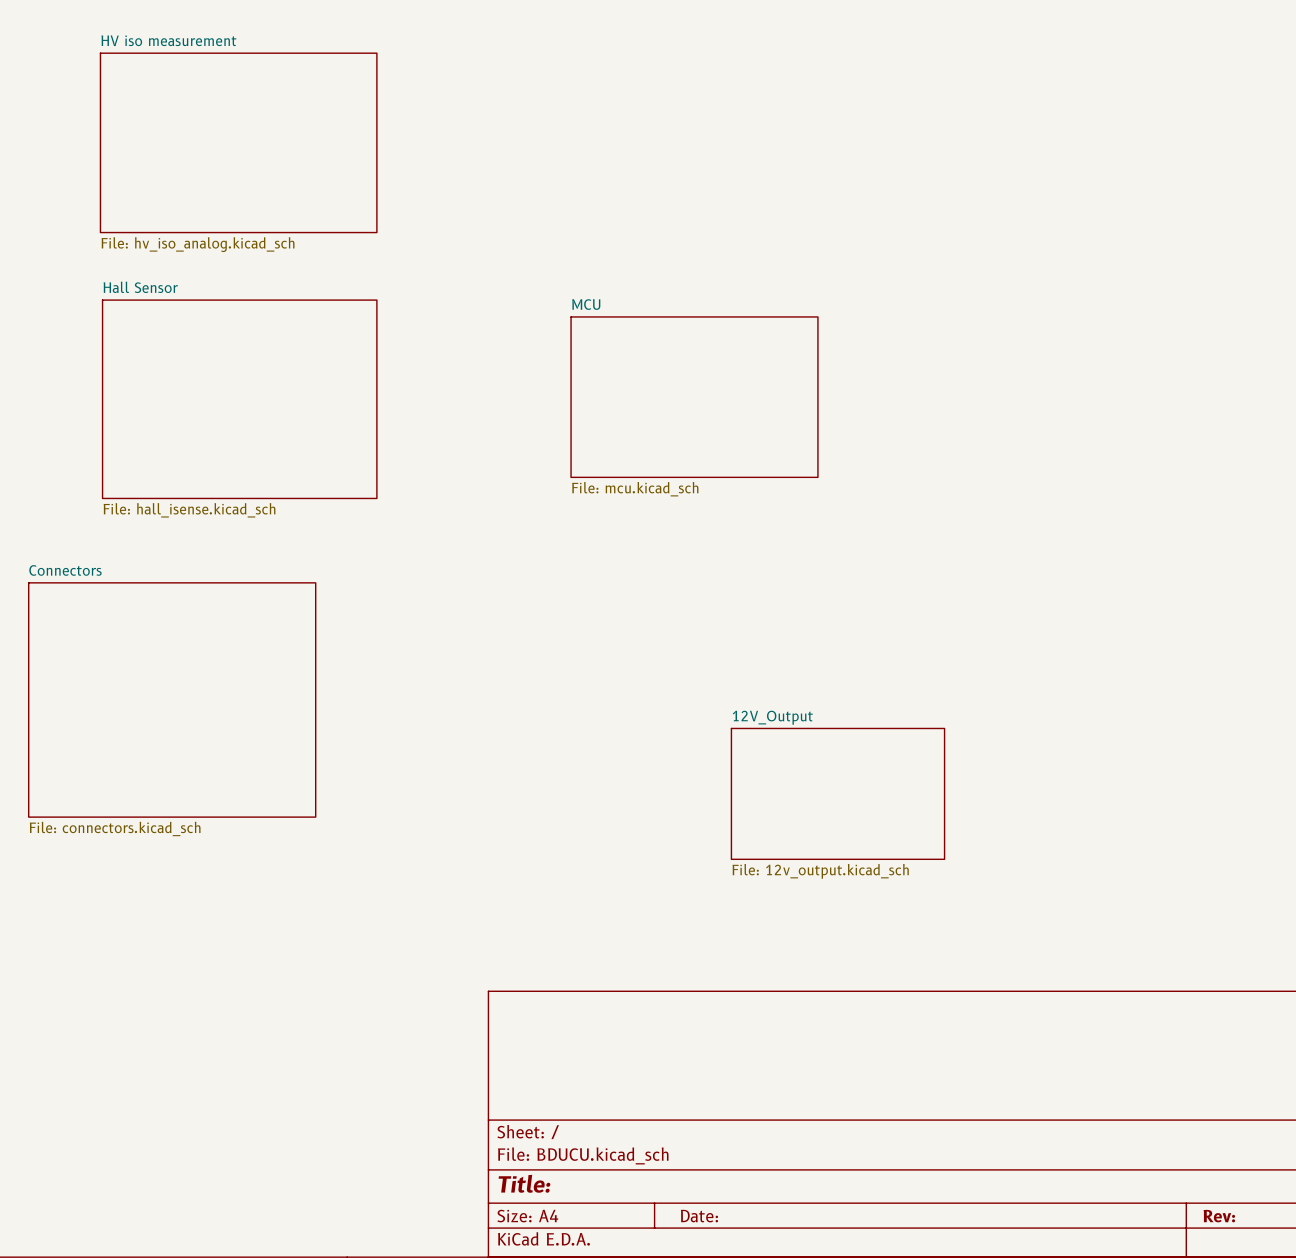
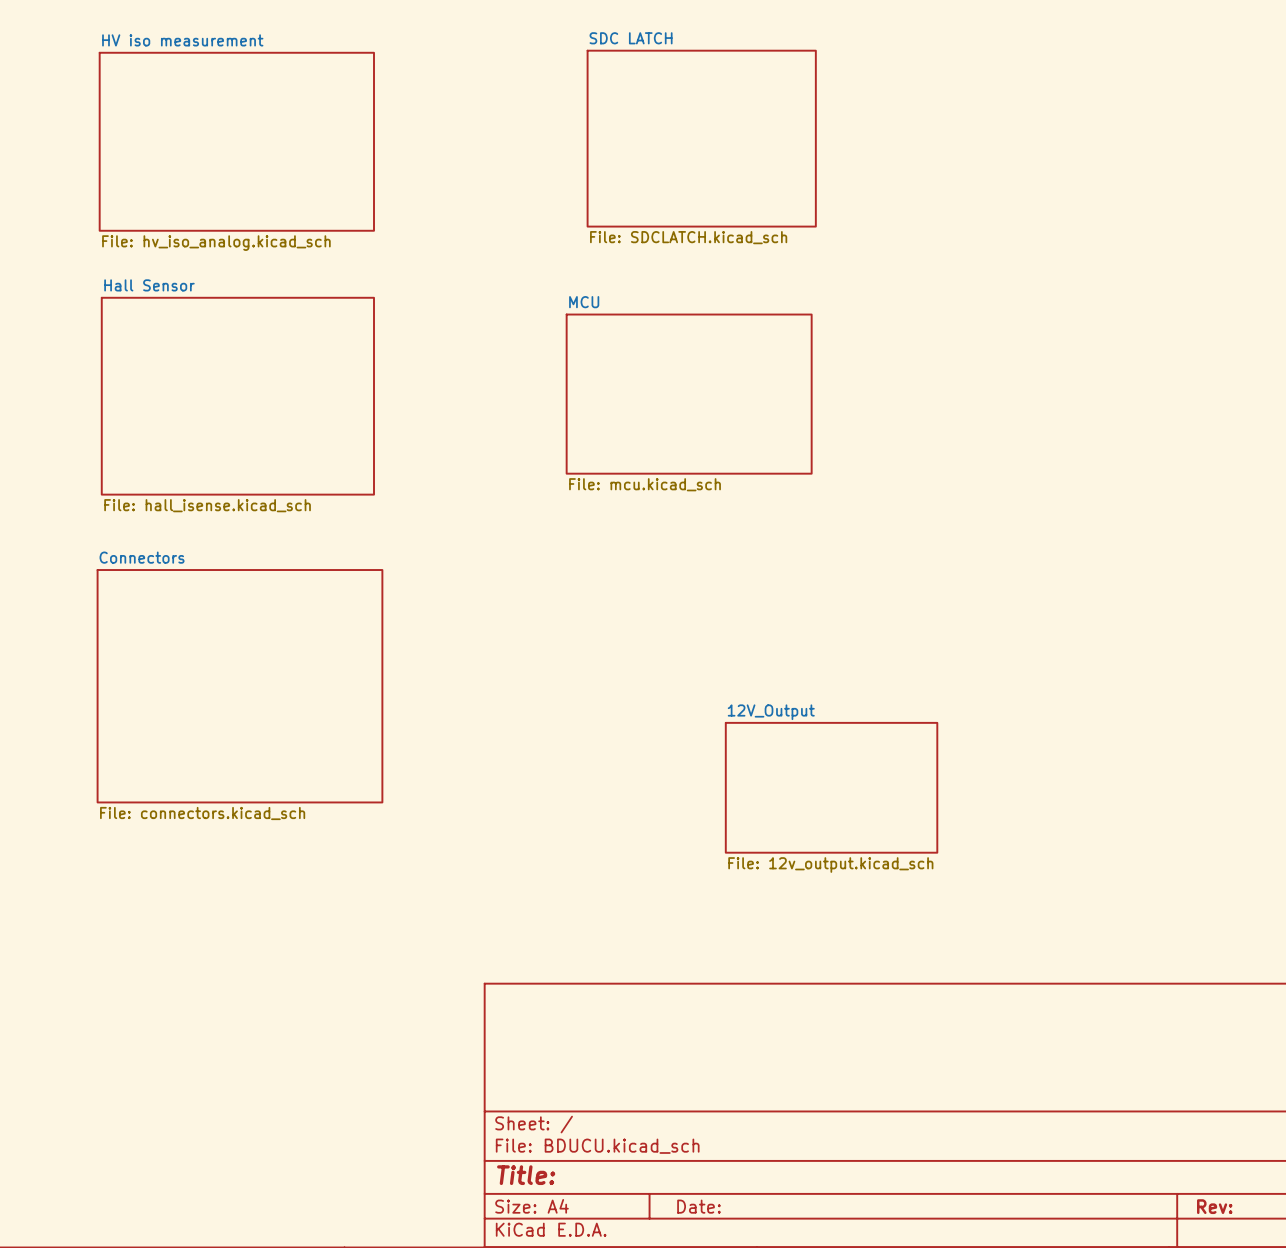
sheet SDC LATCH: none -> File: SDCLATCH.kicad_sch (701, 138)
sheet Connectors position: (172, 699) -> (239, 686)

